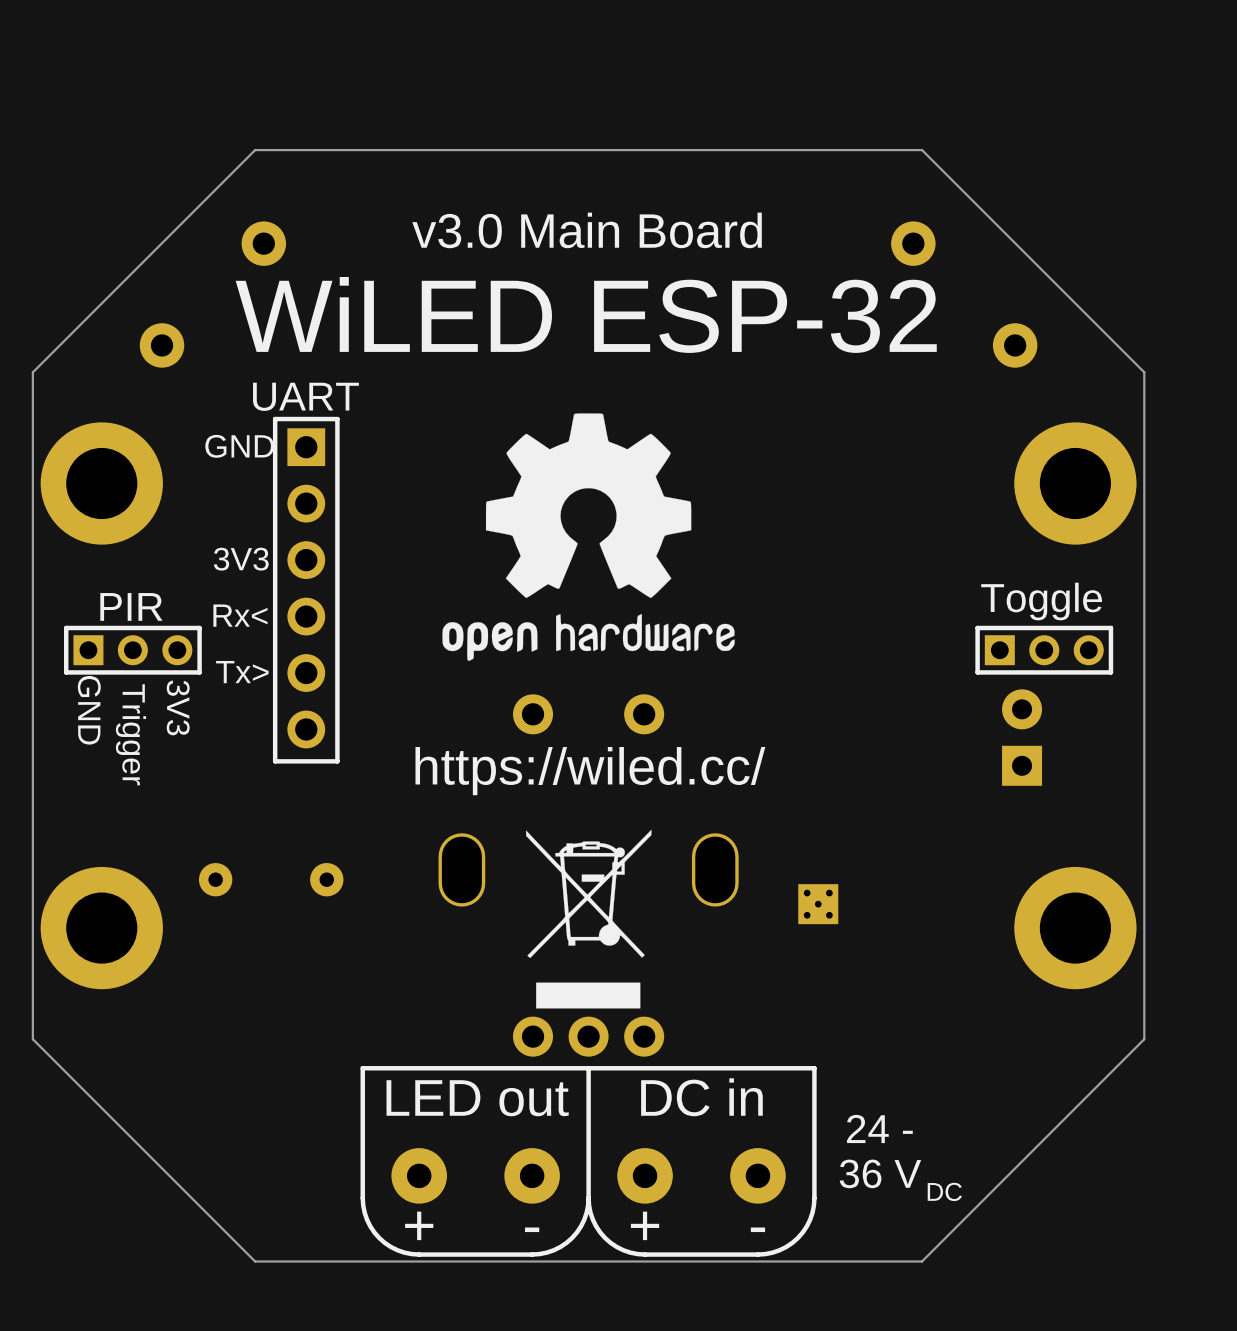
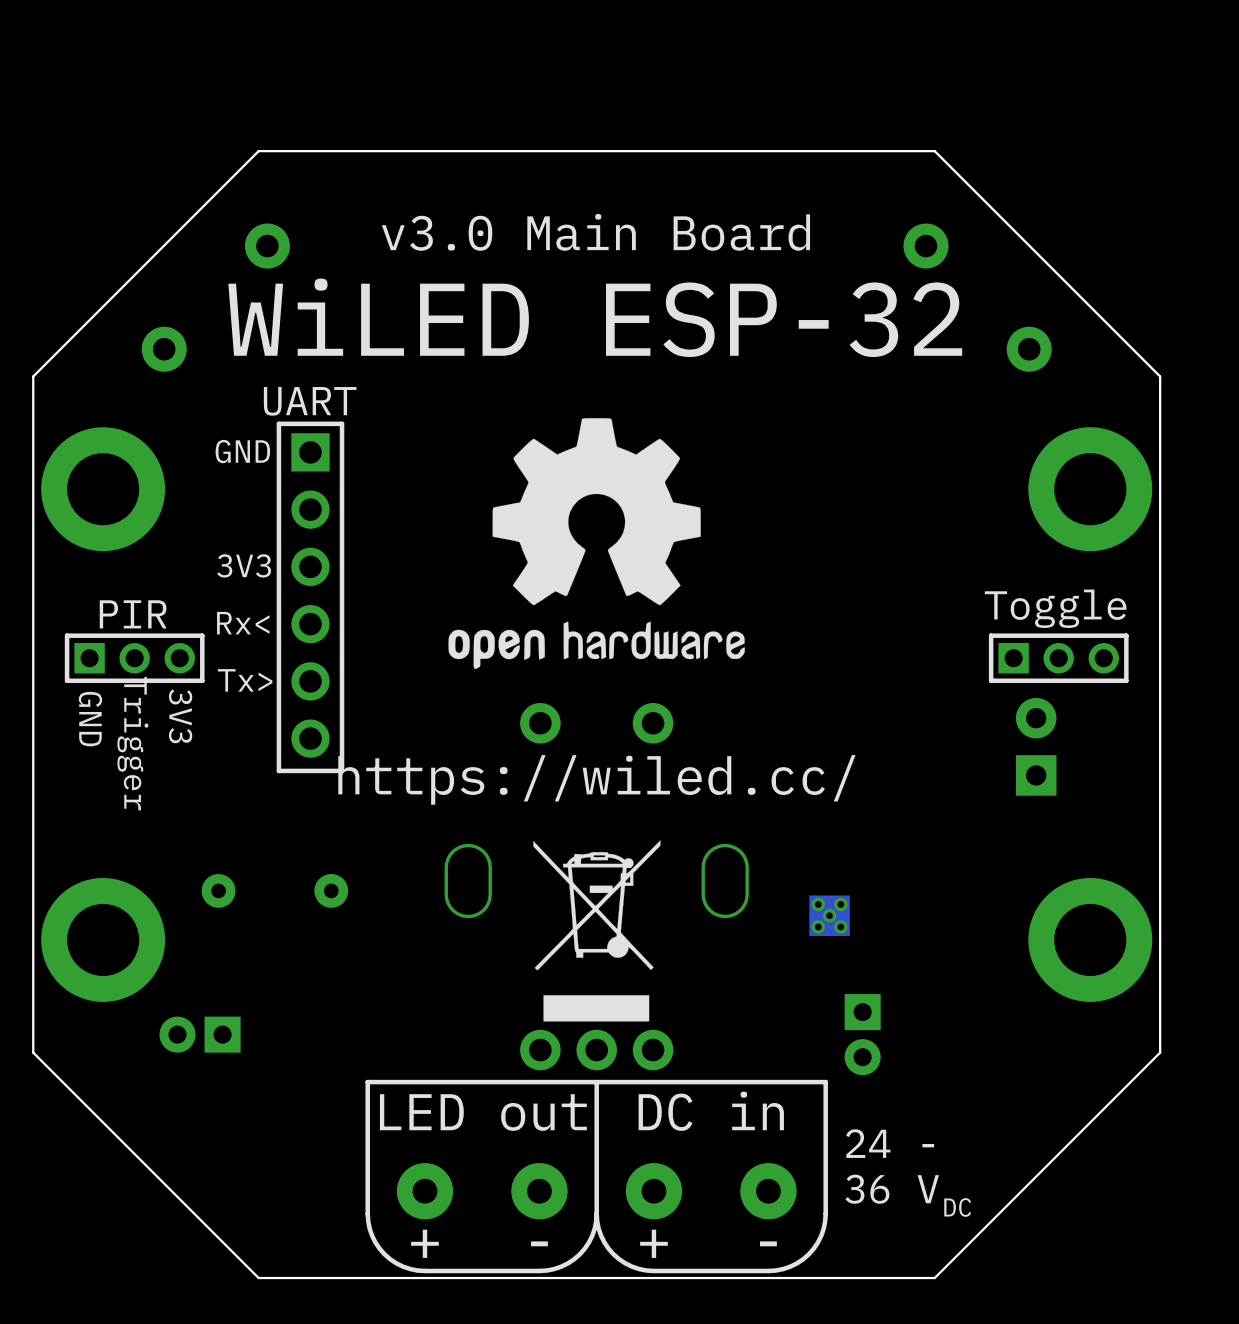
part: none -> (200, 1034)
part: none -> (862, 1034)

